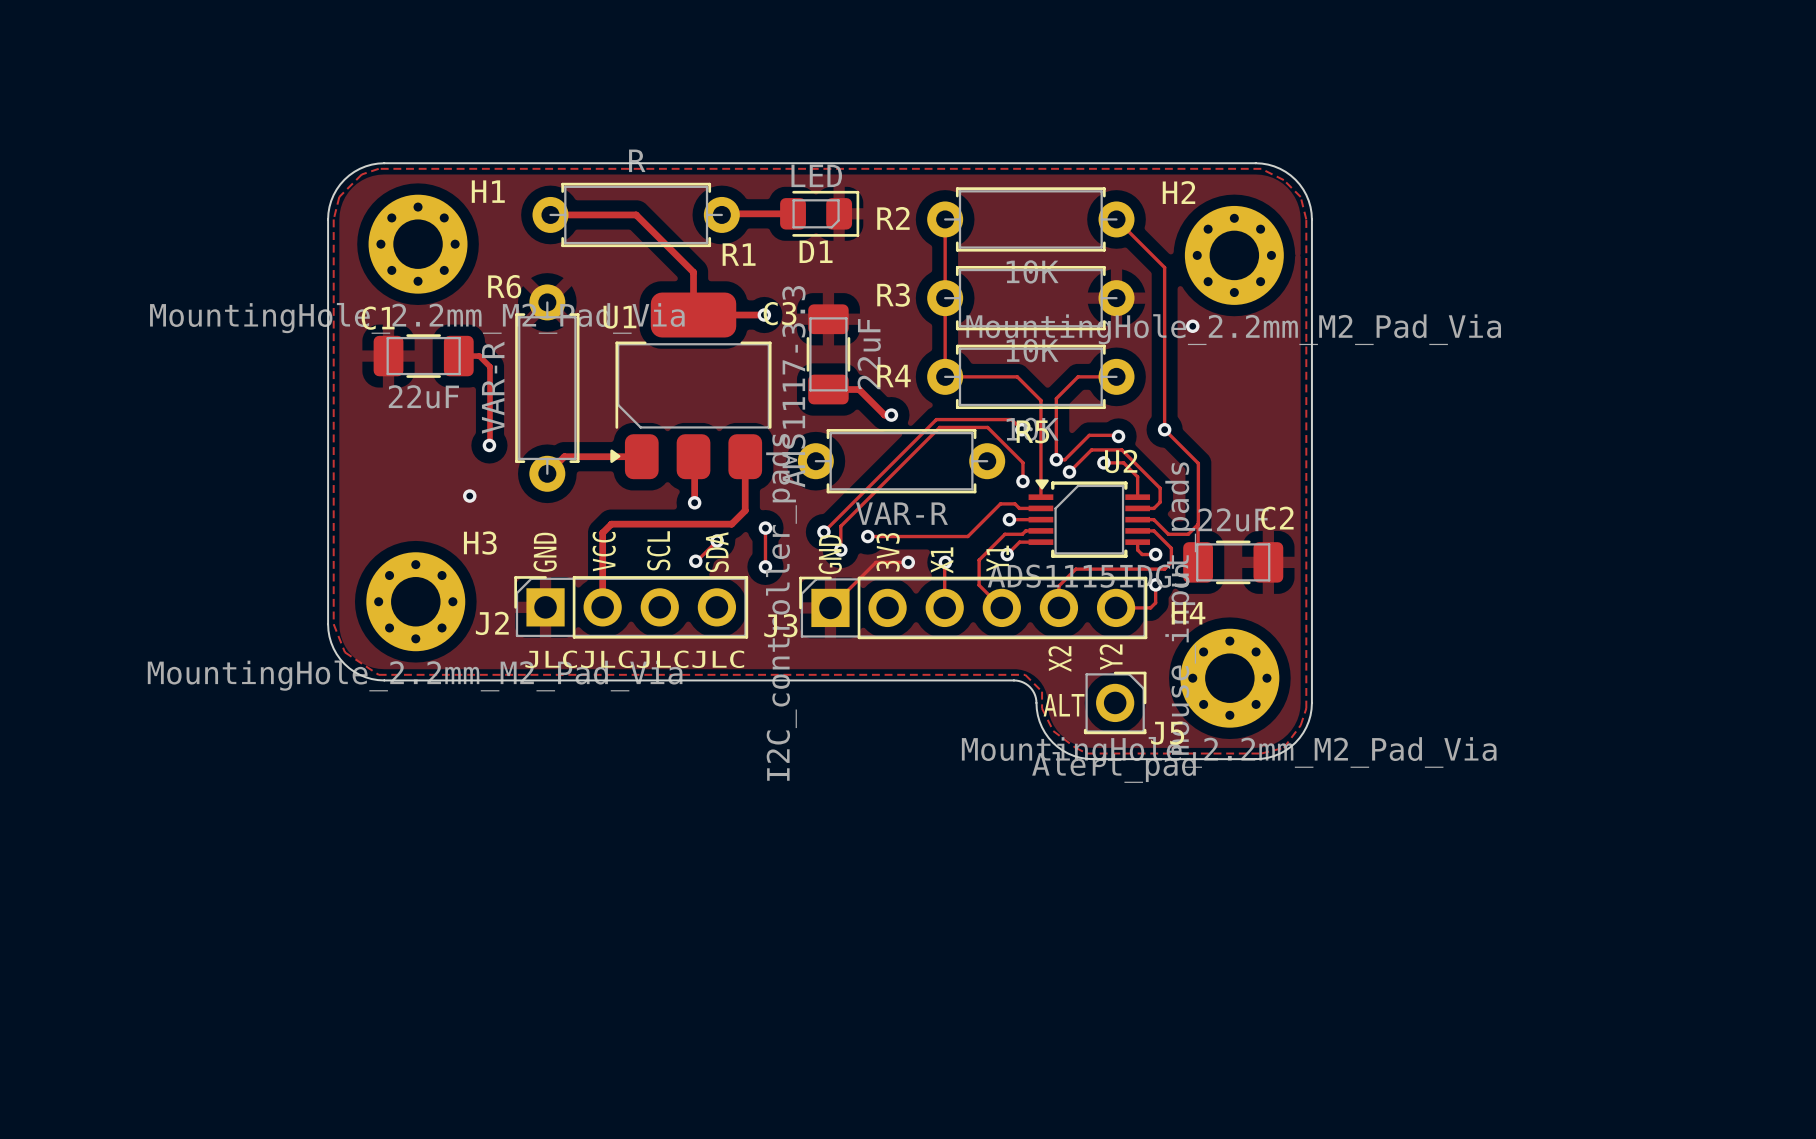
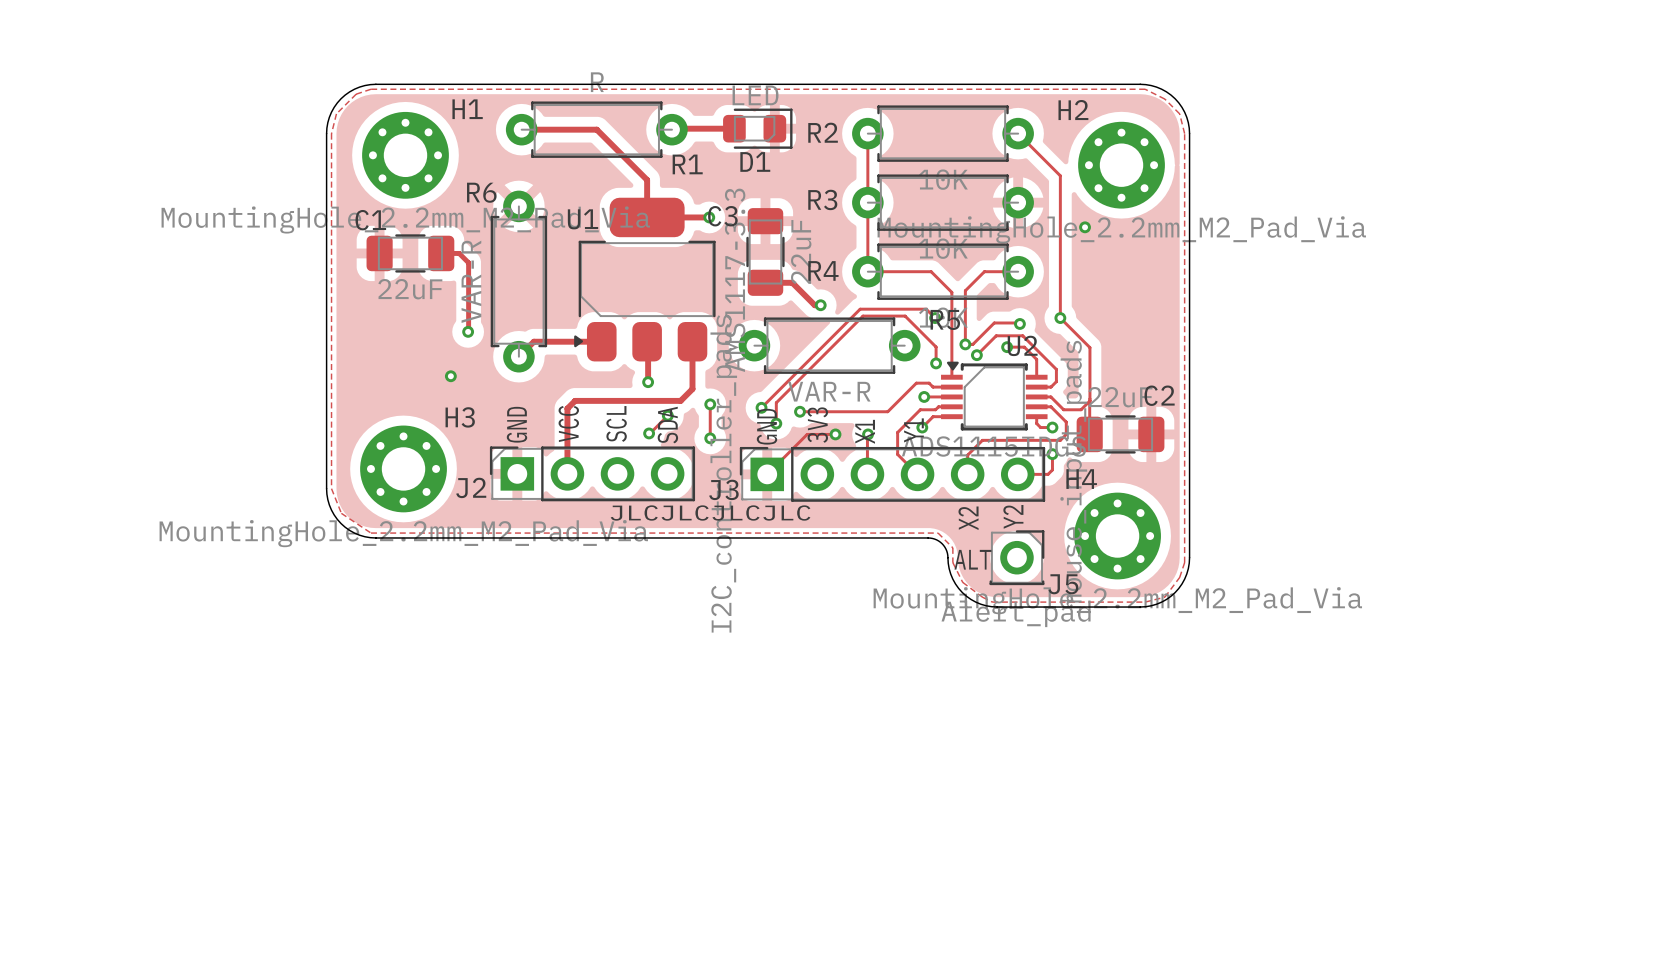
text position: JLCJLCJLCJLC (634, 659) -> JLCJLCJLCJLC (710, 513)

